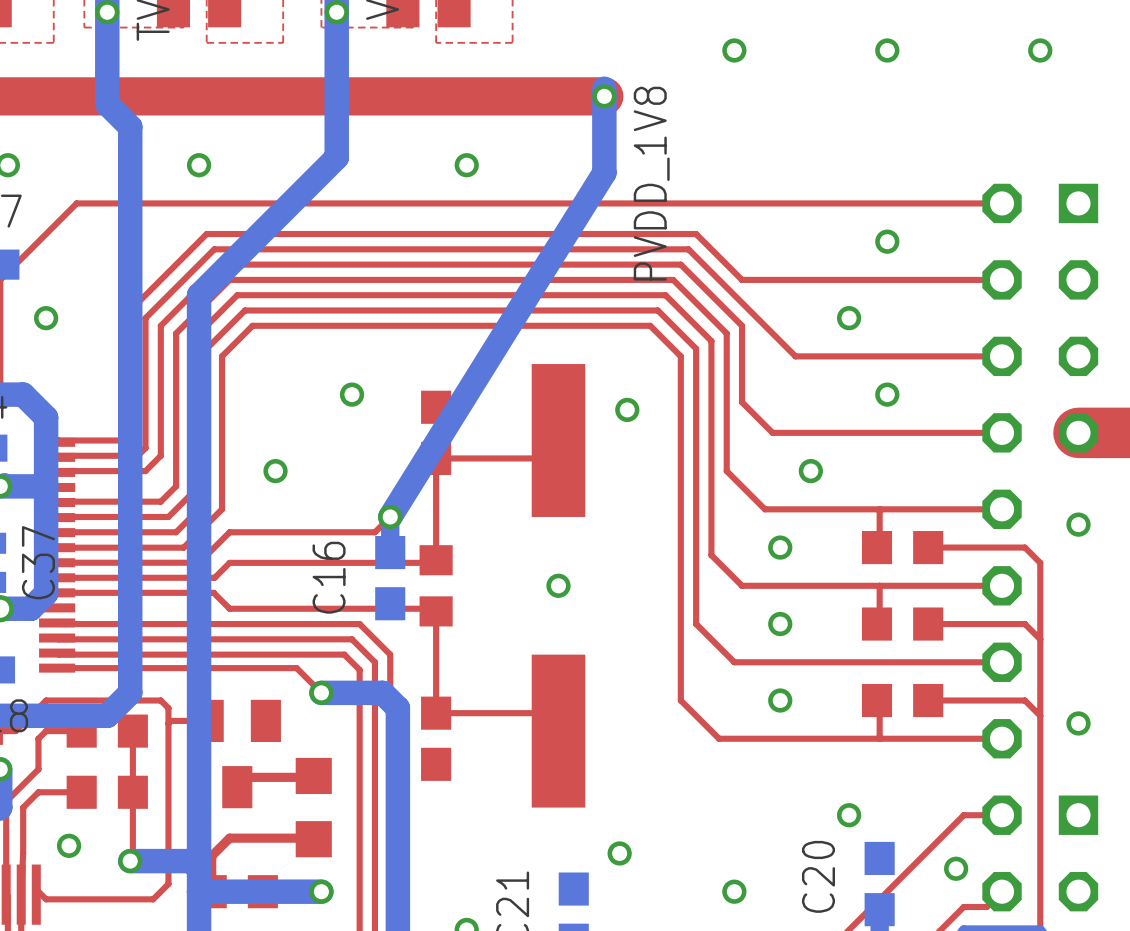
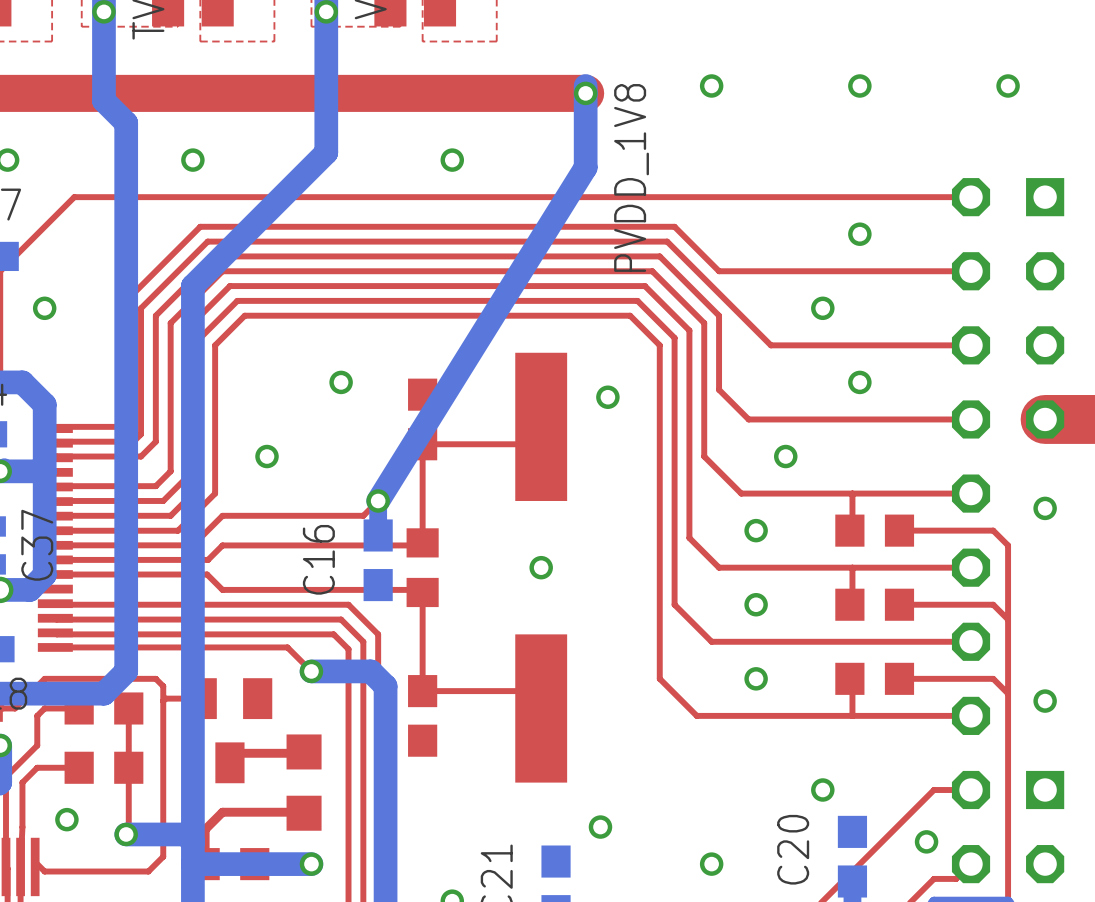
via position: (734, 50) -> (711, 85)
via: (887, 50) -> none
via position: (1040, 50) -> (1008, 85)
via: none -> (859, 85)

